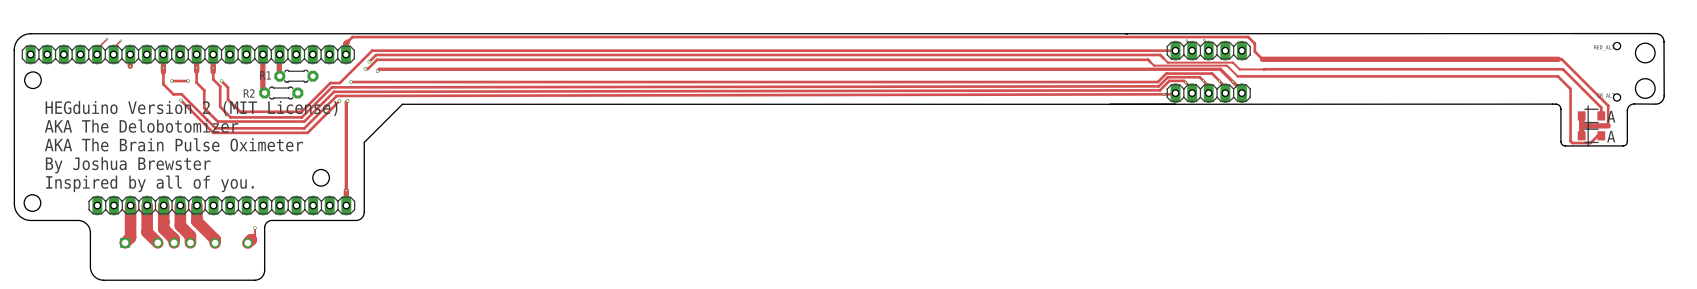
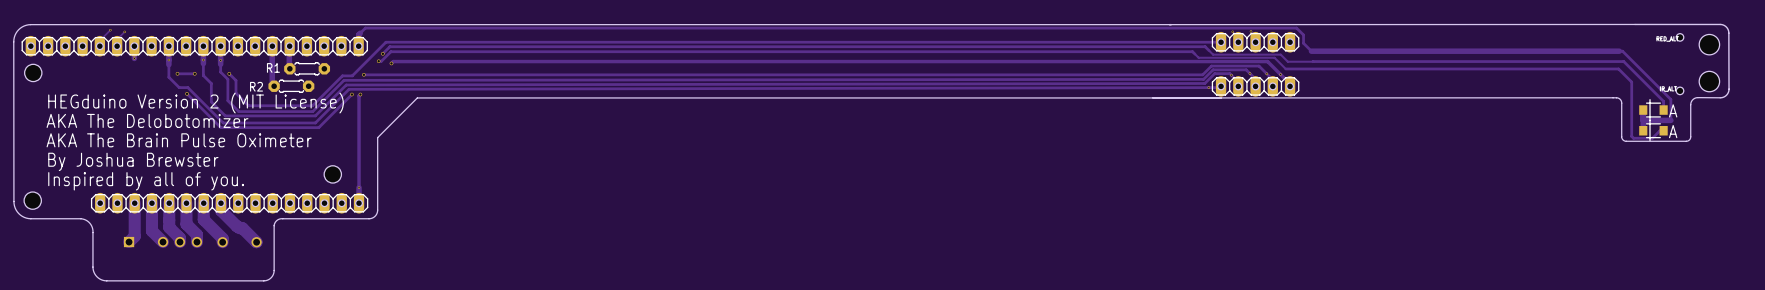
track: none -> (220, 203) (220, 210) (256, 242)
track: (255, 227) (255, 235) (247, 243) (251, 239) -> none
via: (255, 227) -> none

